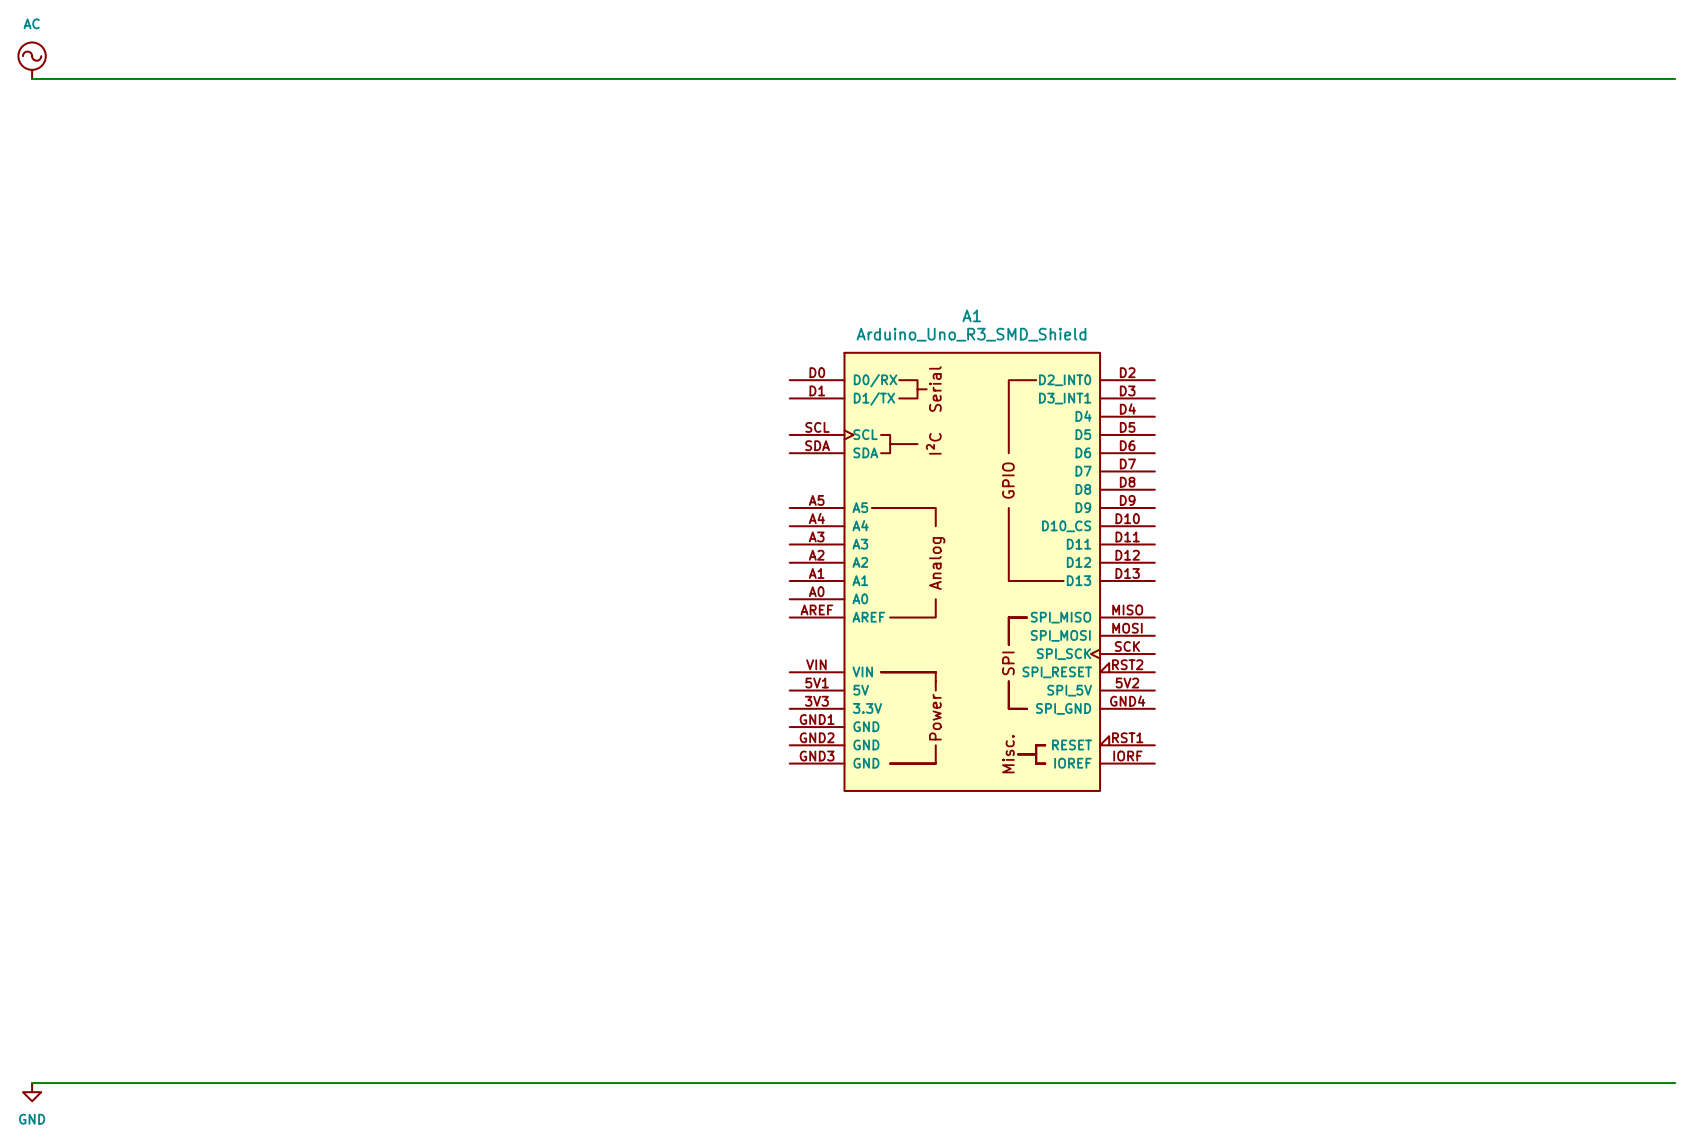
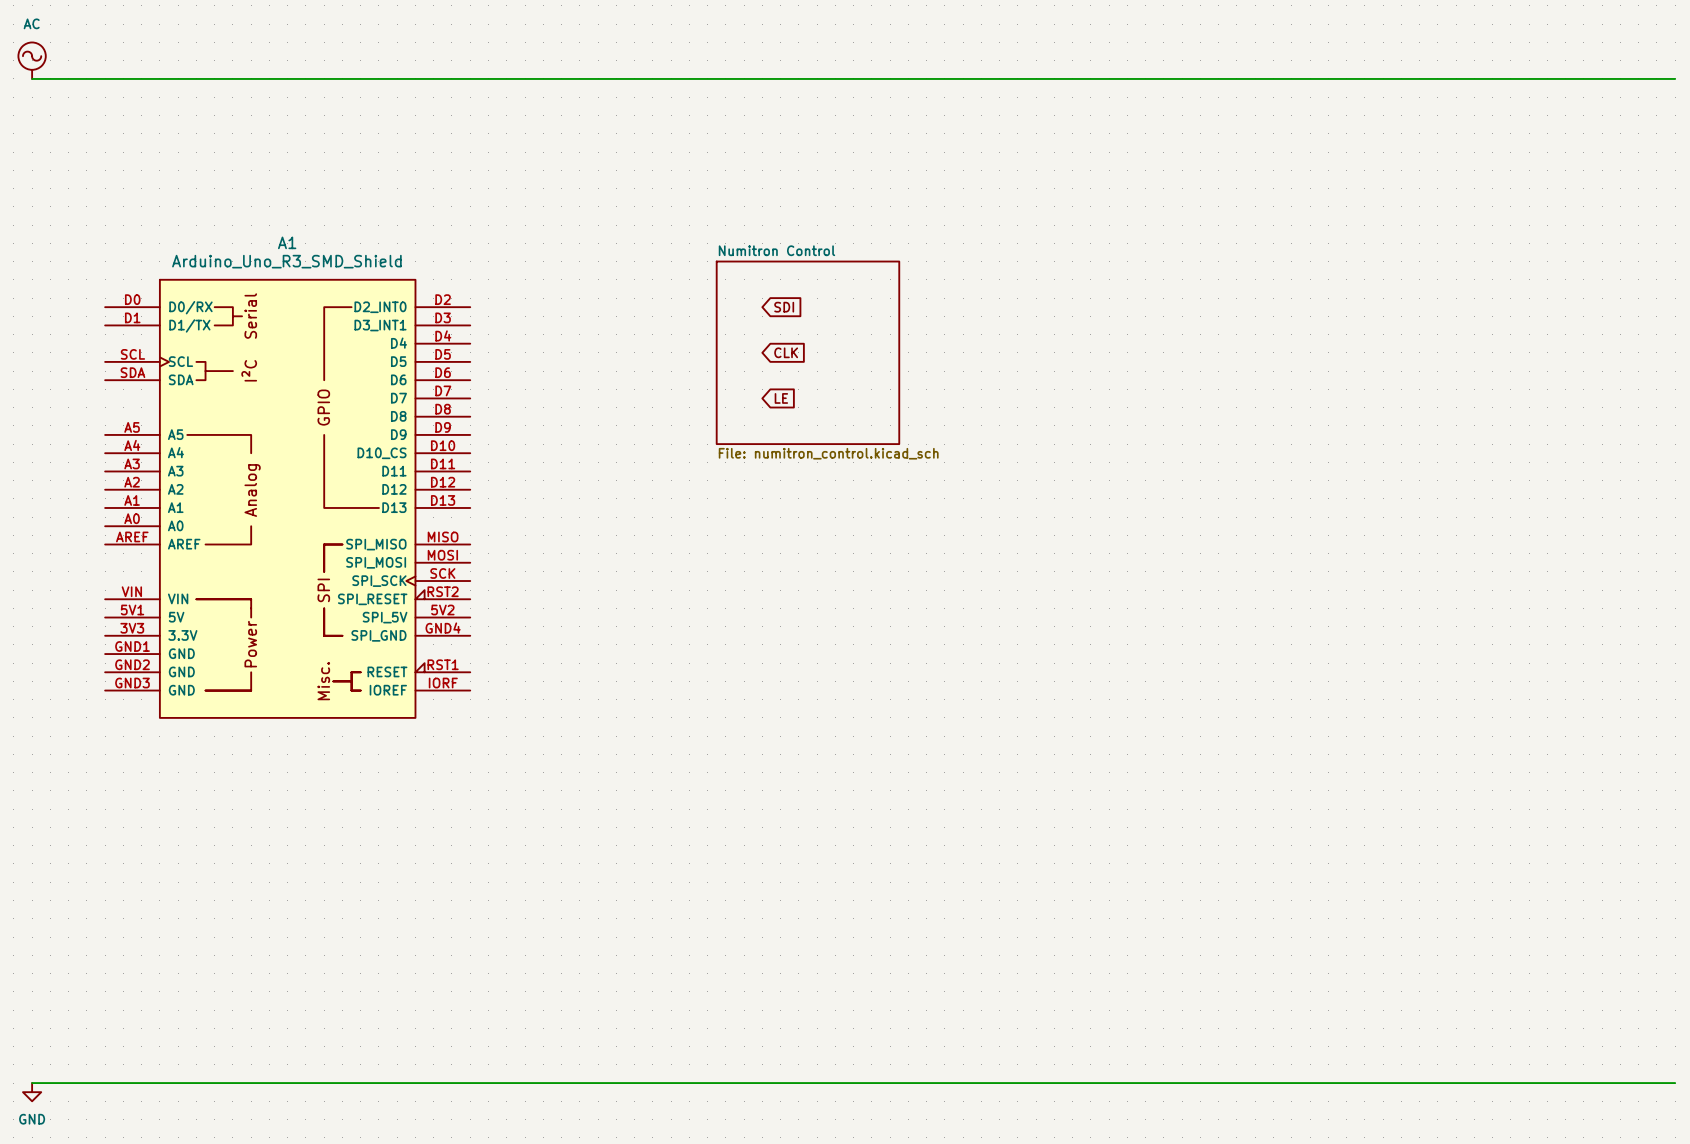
global label: none -> SDI (784, 307)
global label: none -> CLK (786, 352)
sheet Numitron Control: none -> File: numitron_control.kicad_sch (807, 352)
global label: none -> LE (781, 398)
A1 position: (972, 571) -> (287, 498)

